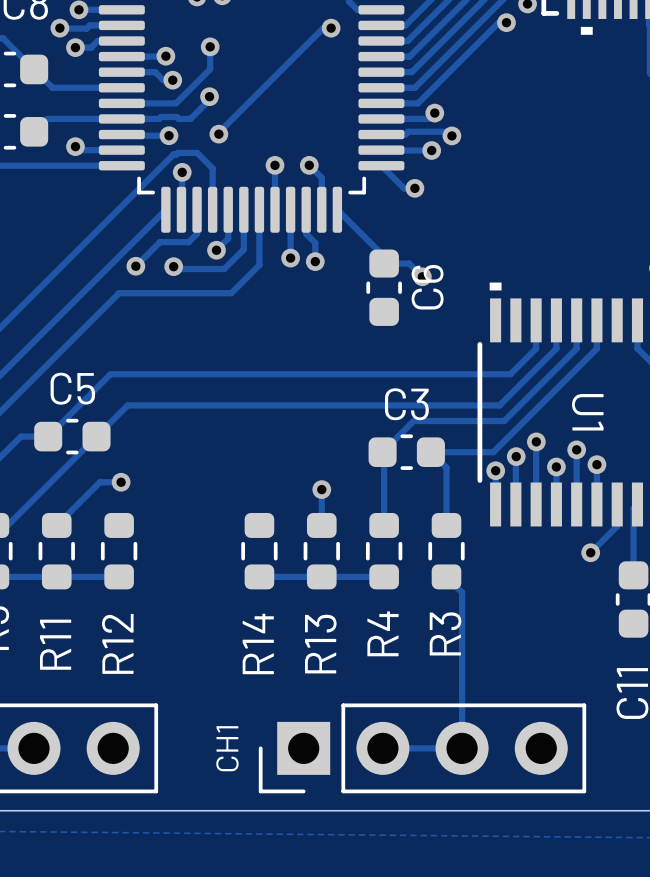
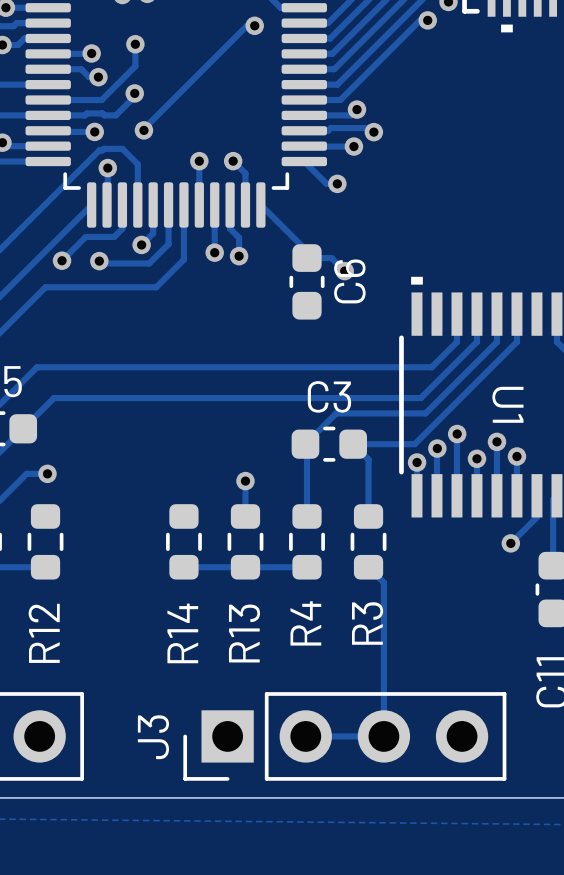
J3 text: CH1 (227, 748) -> none
J3 name: none -> J3 (153, 737)

